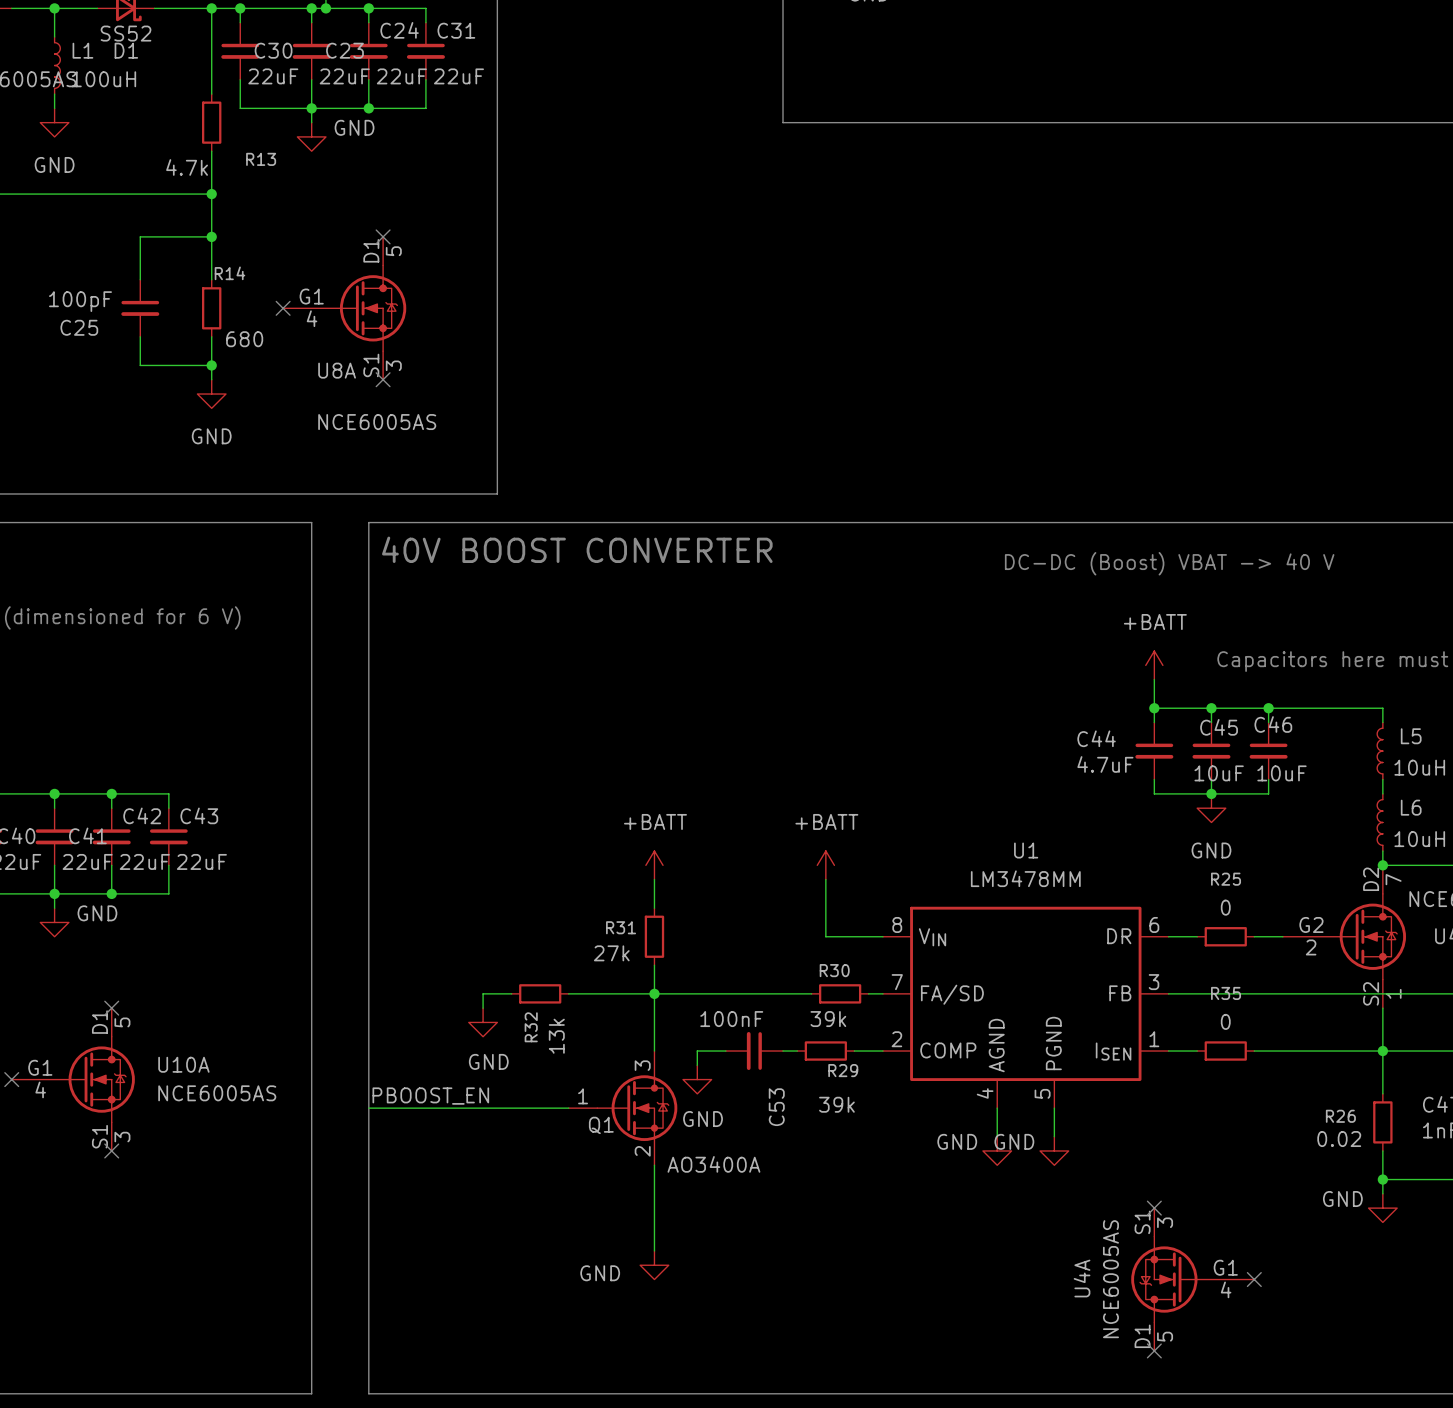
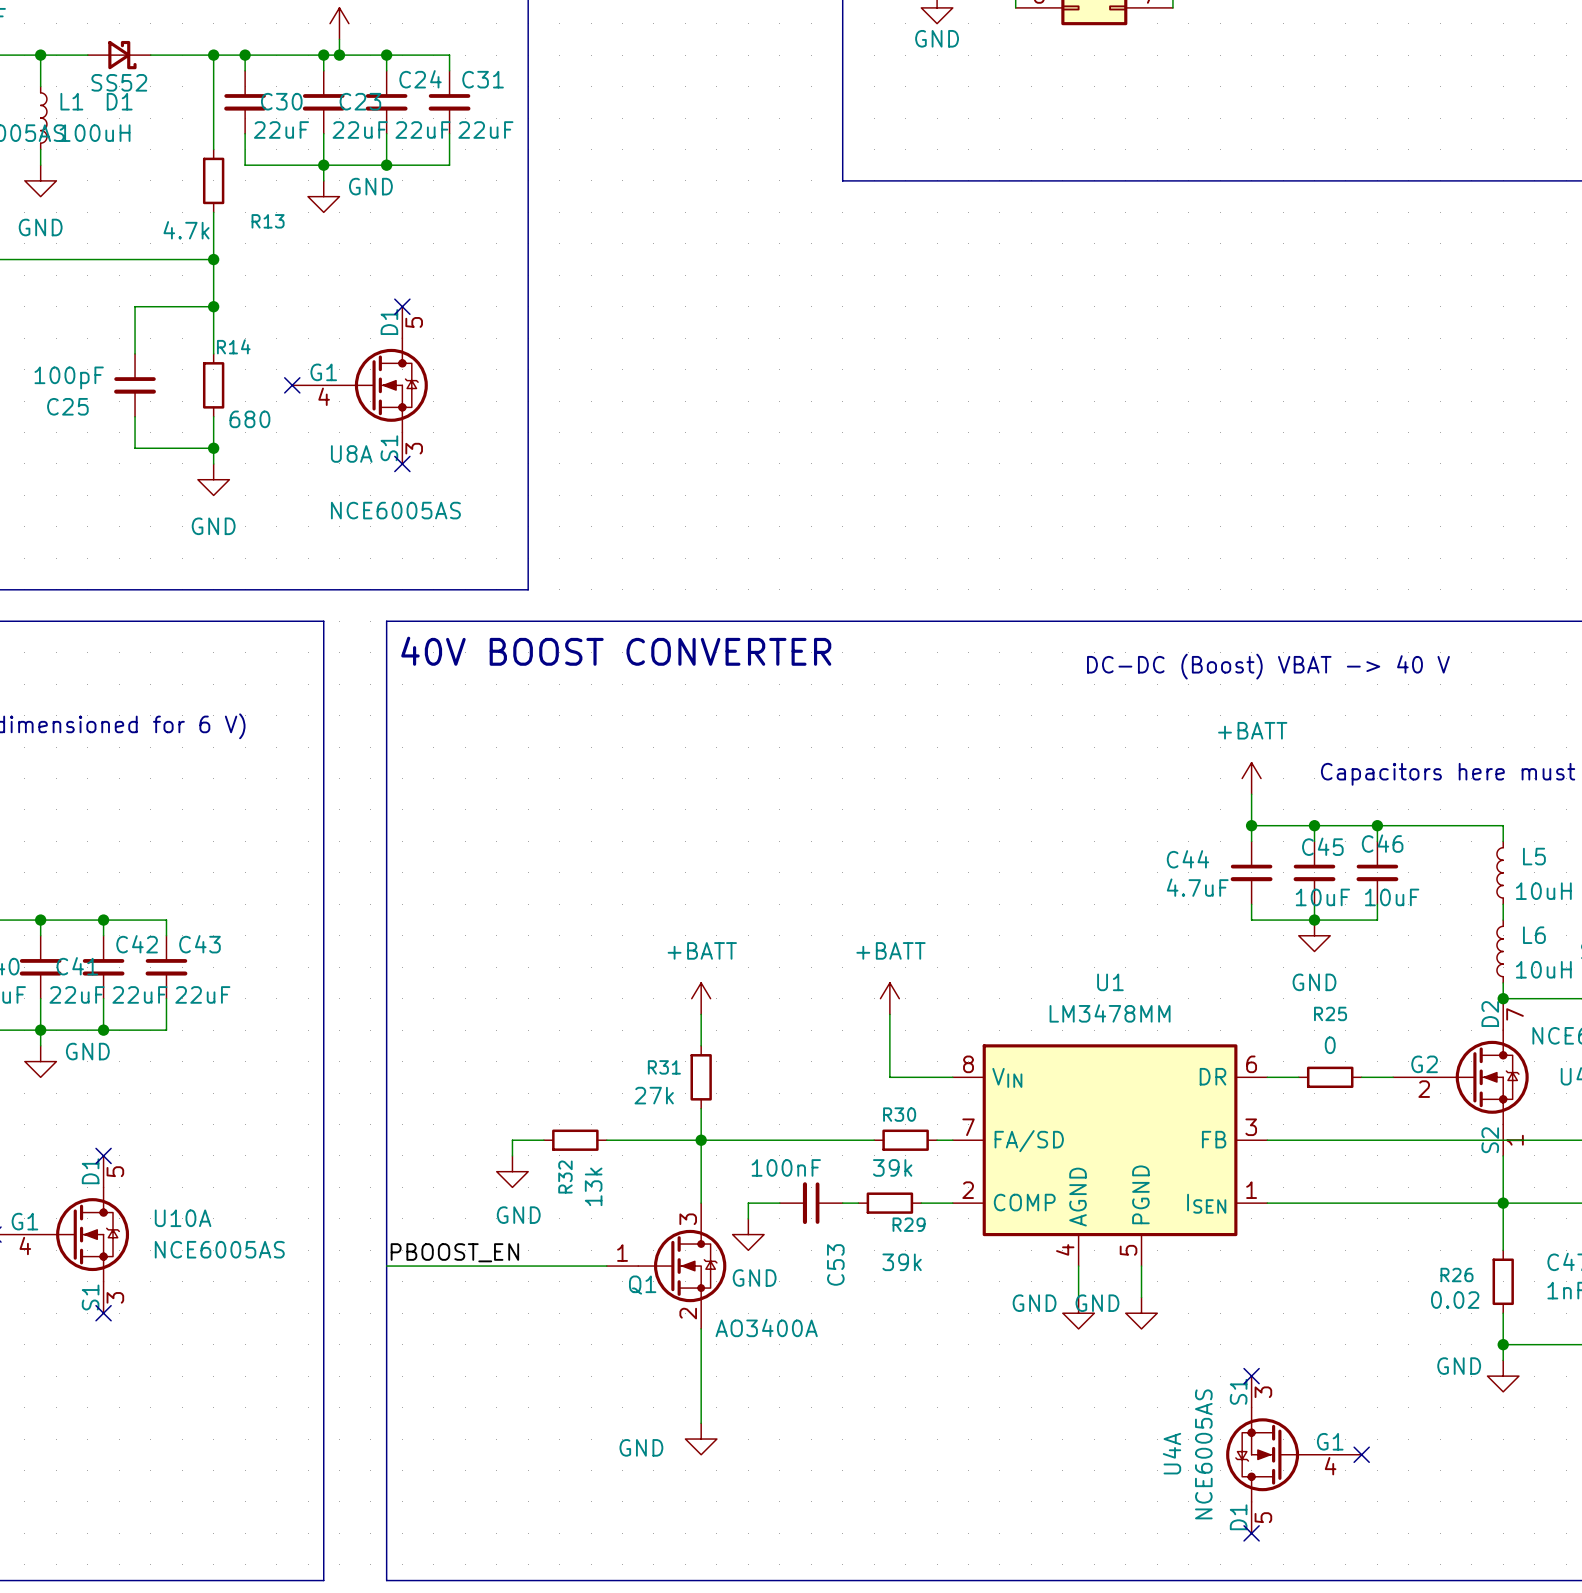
wire: none -> (1298, 1203) (1361, 1203)
R35: 0 (1225, 1051) -> none

